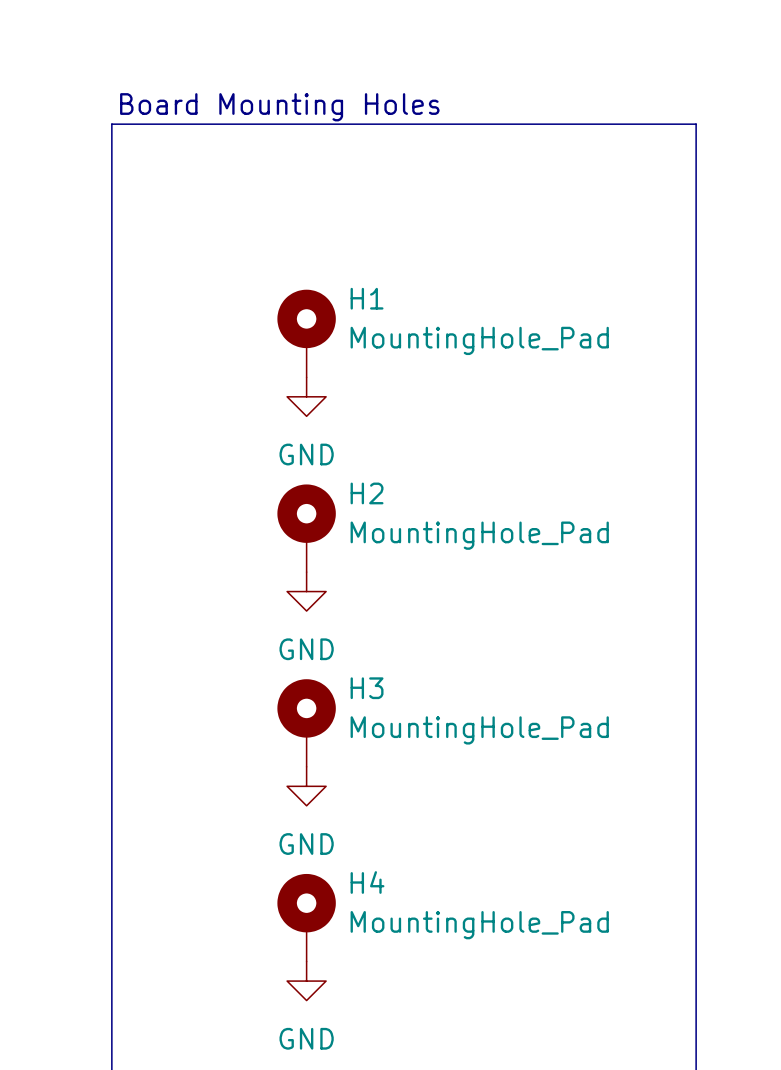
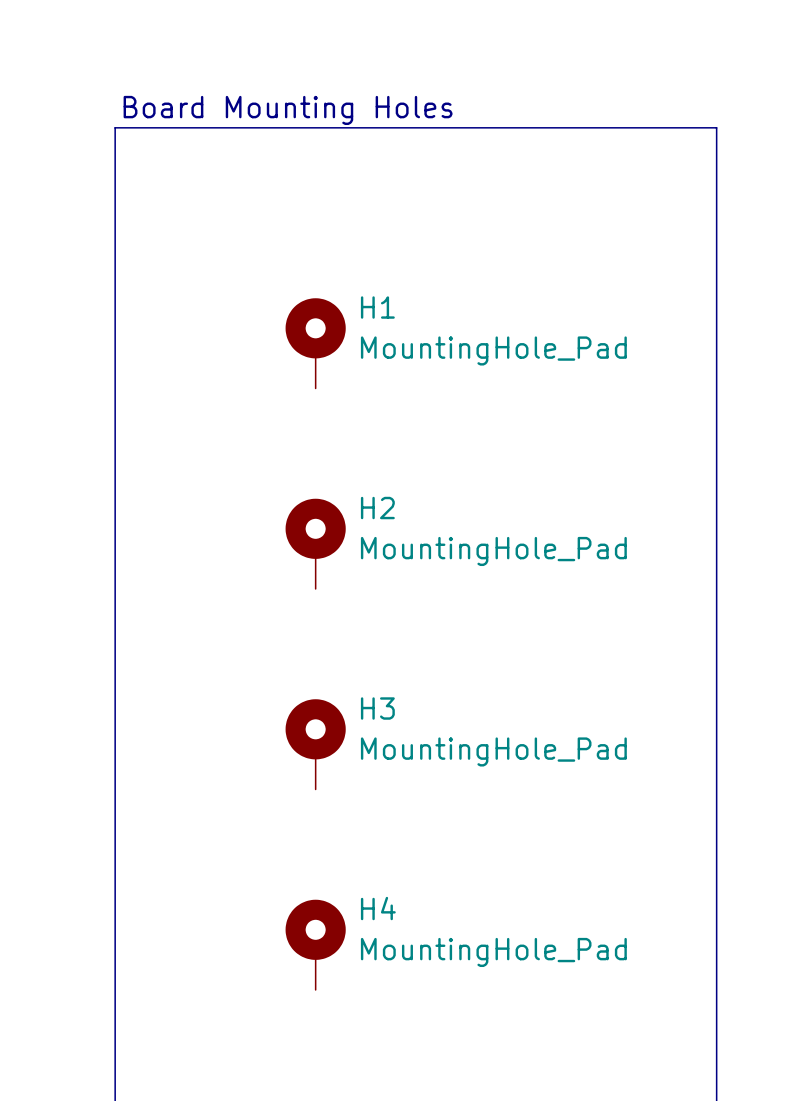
power symbol: GND (306, 396) -> none
power symbol: GND (306, 591) -> none
power symbol: GND (306, 786) -> none
power symbol: GND (306, 981) -> none

